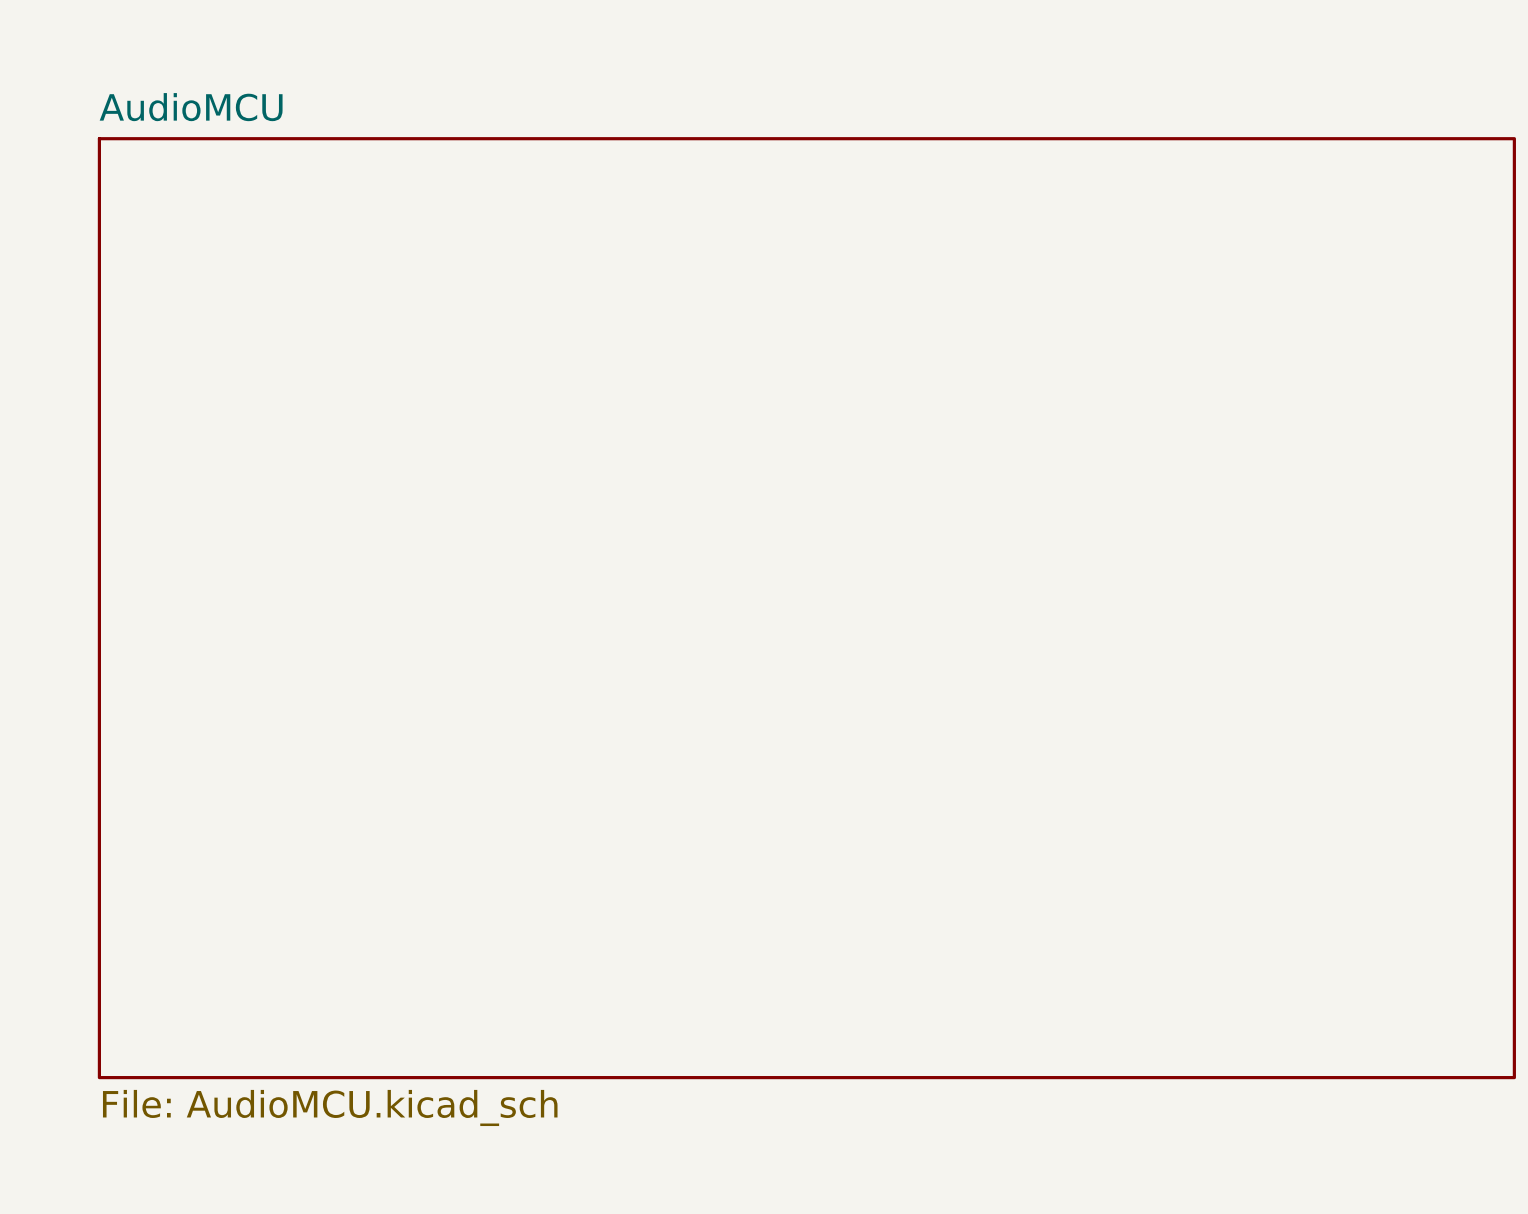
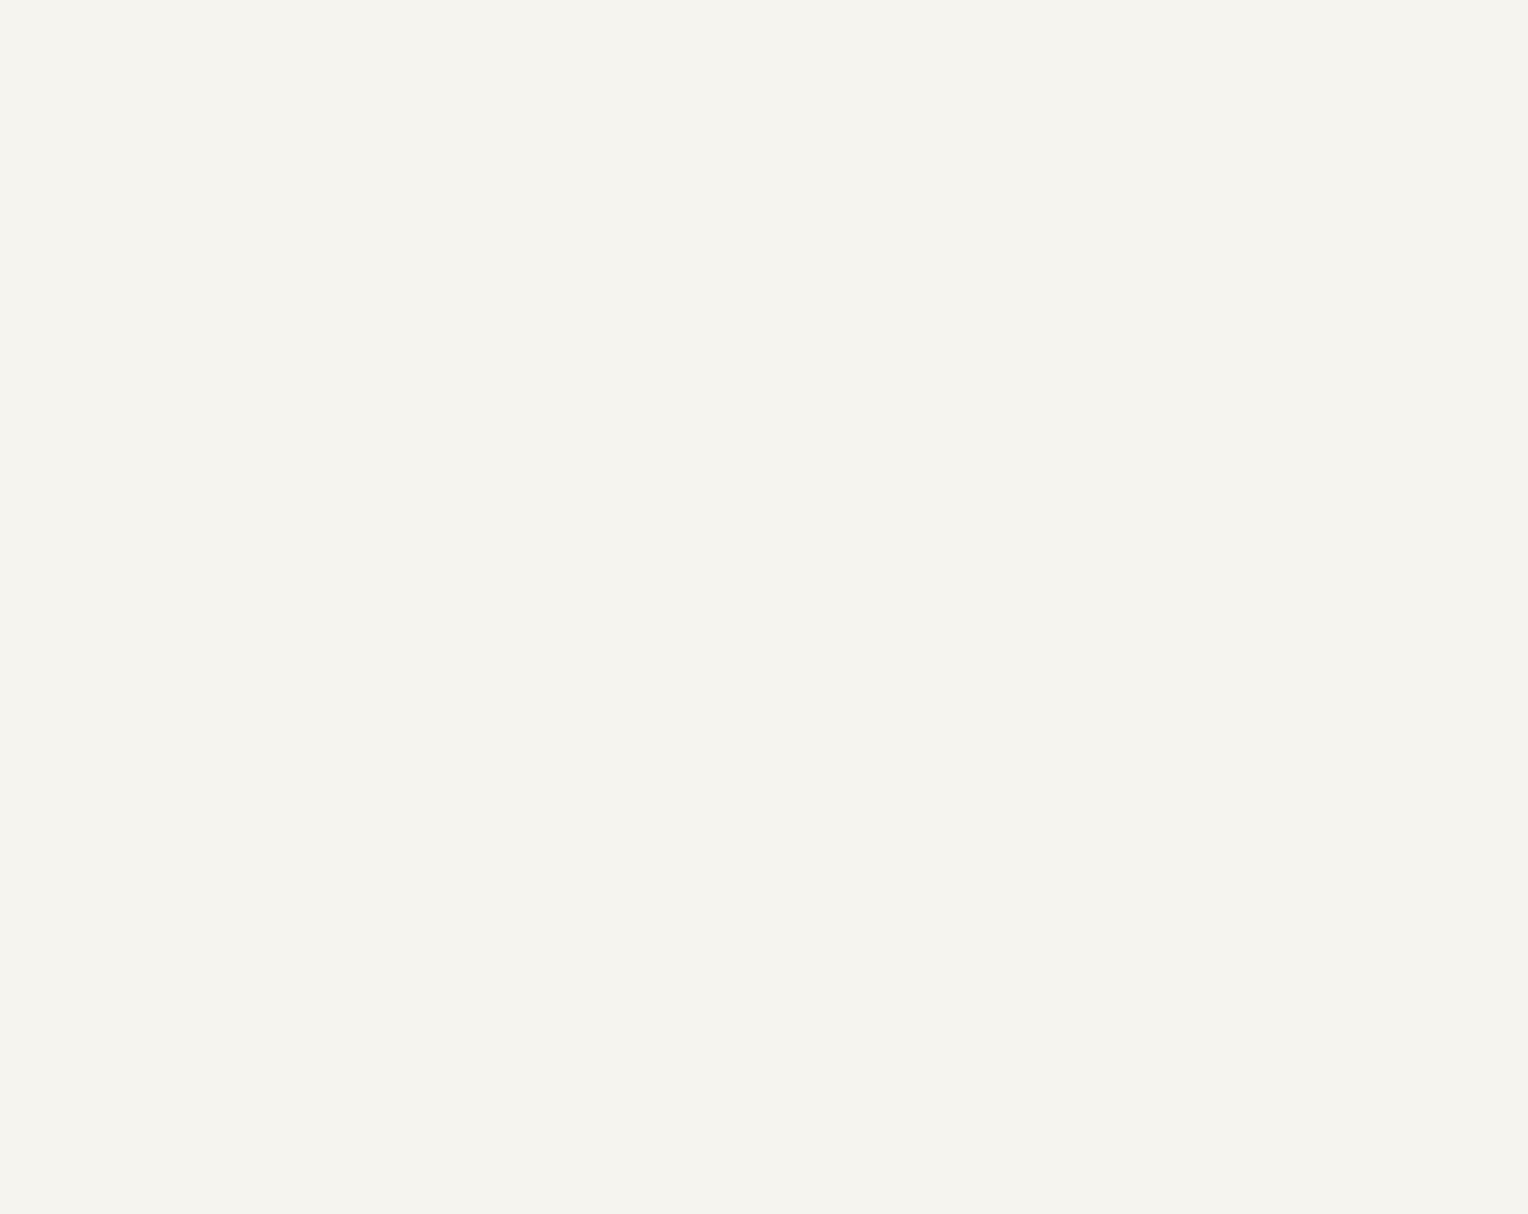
sheet AudioMCU: File: AudioMCU.kicad_sch (806, 608) -> none

